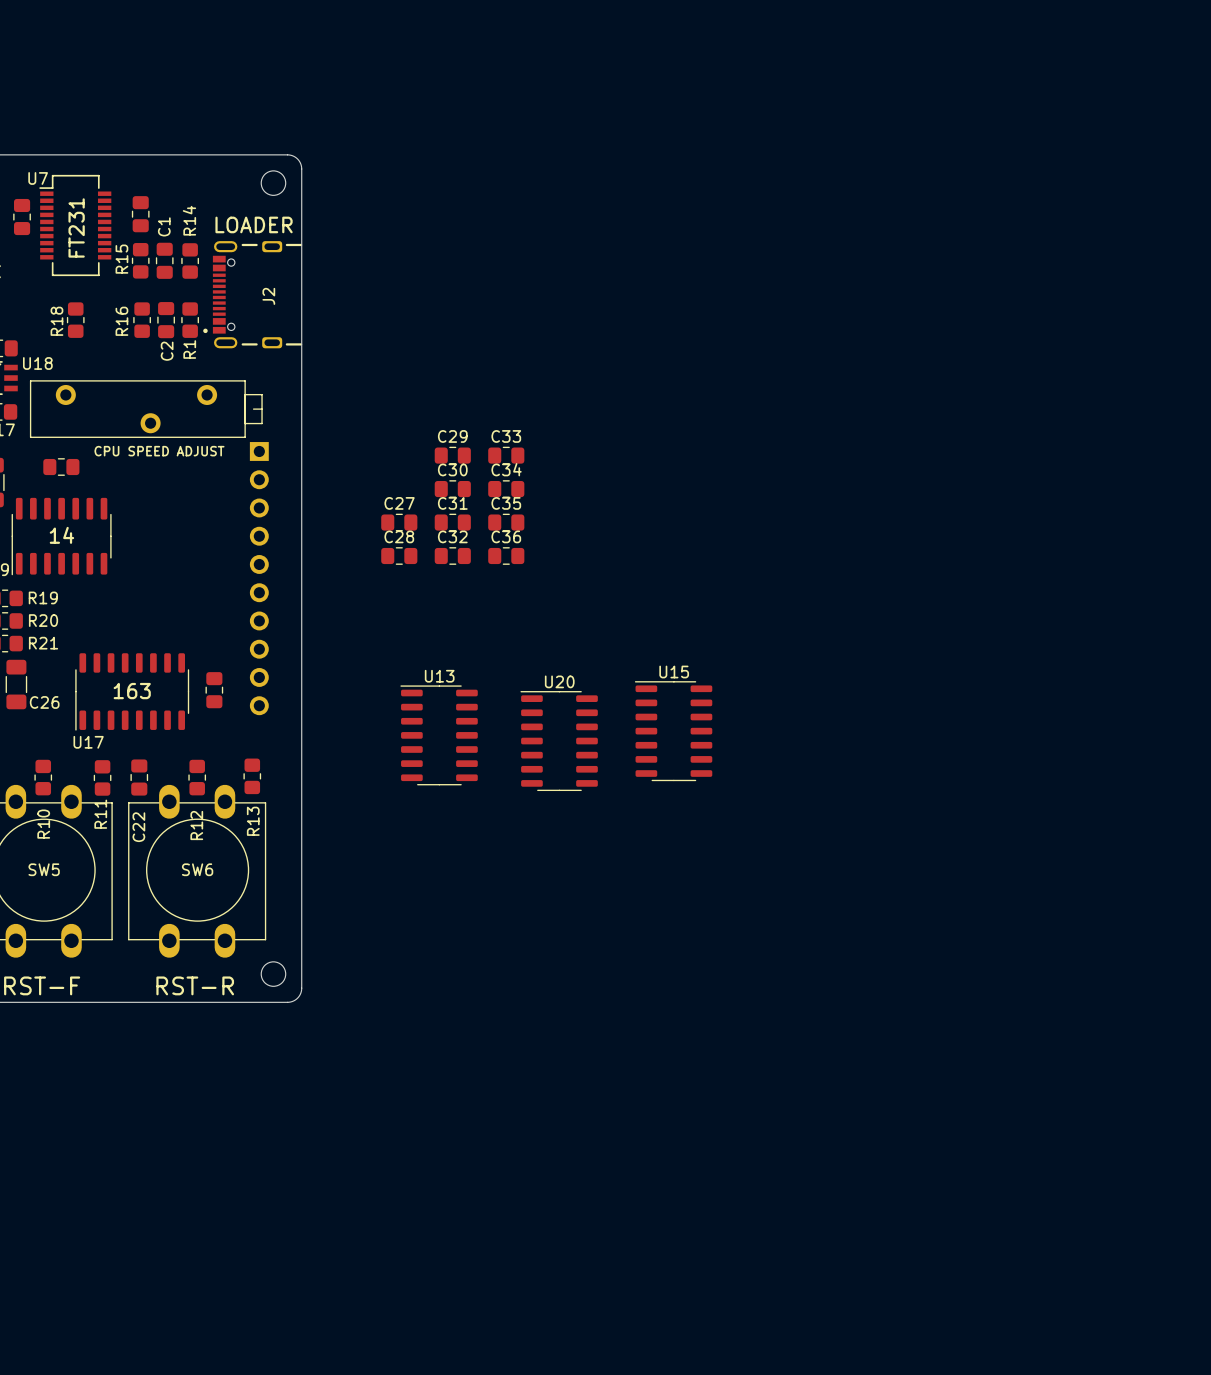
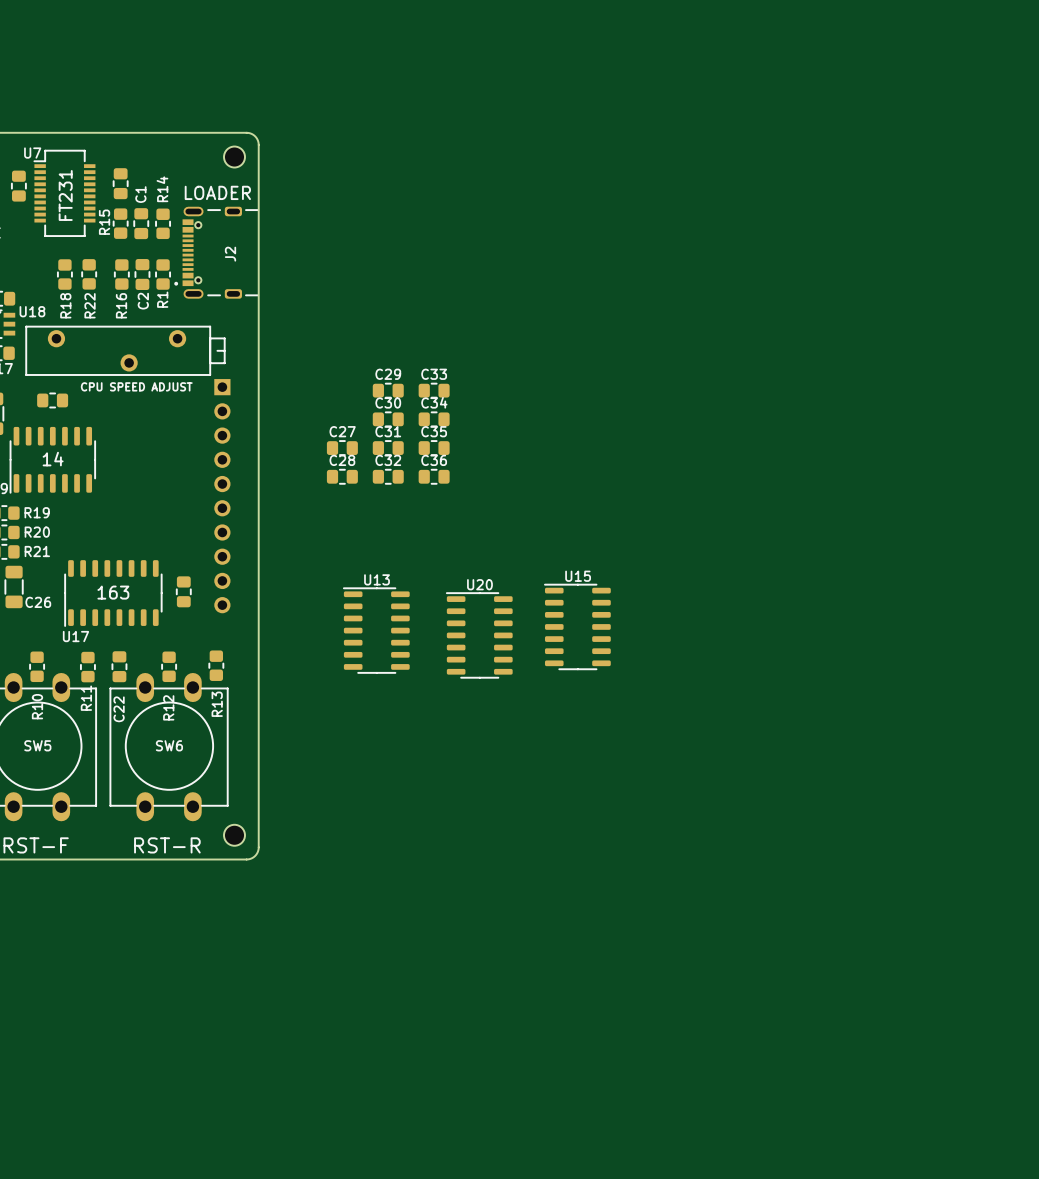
R22: none -> (89, 274)
R18 name position: R18 (56, 321) -> R18 (65, 305)
R16 name position: R16 (121, 321) -> R16 (121, 305)

